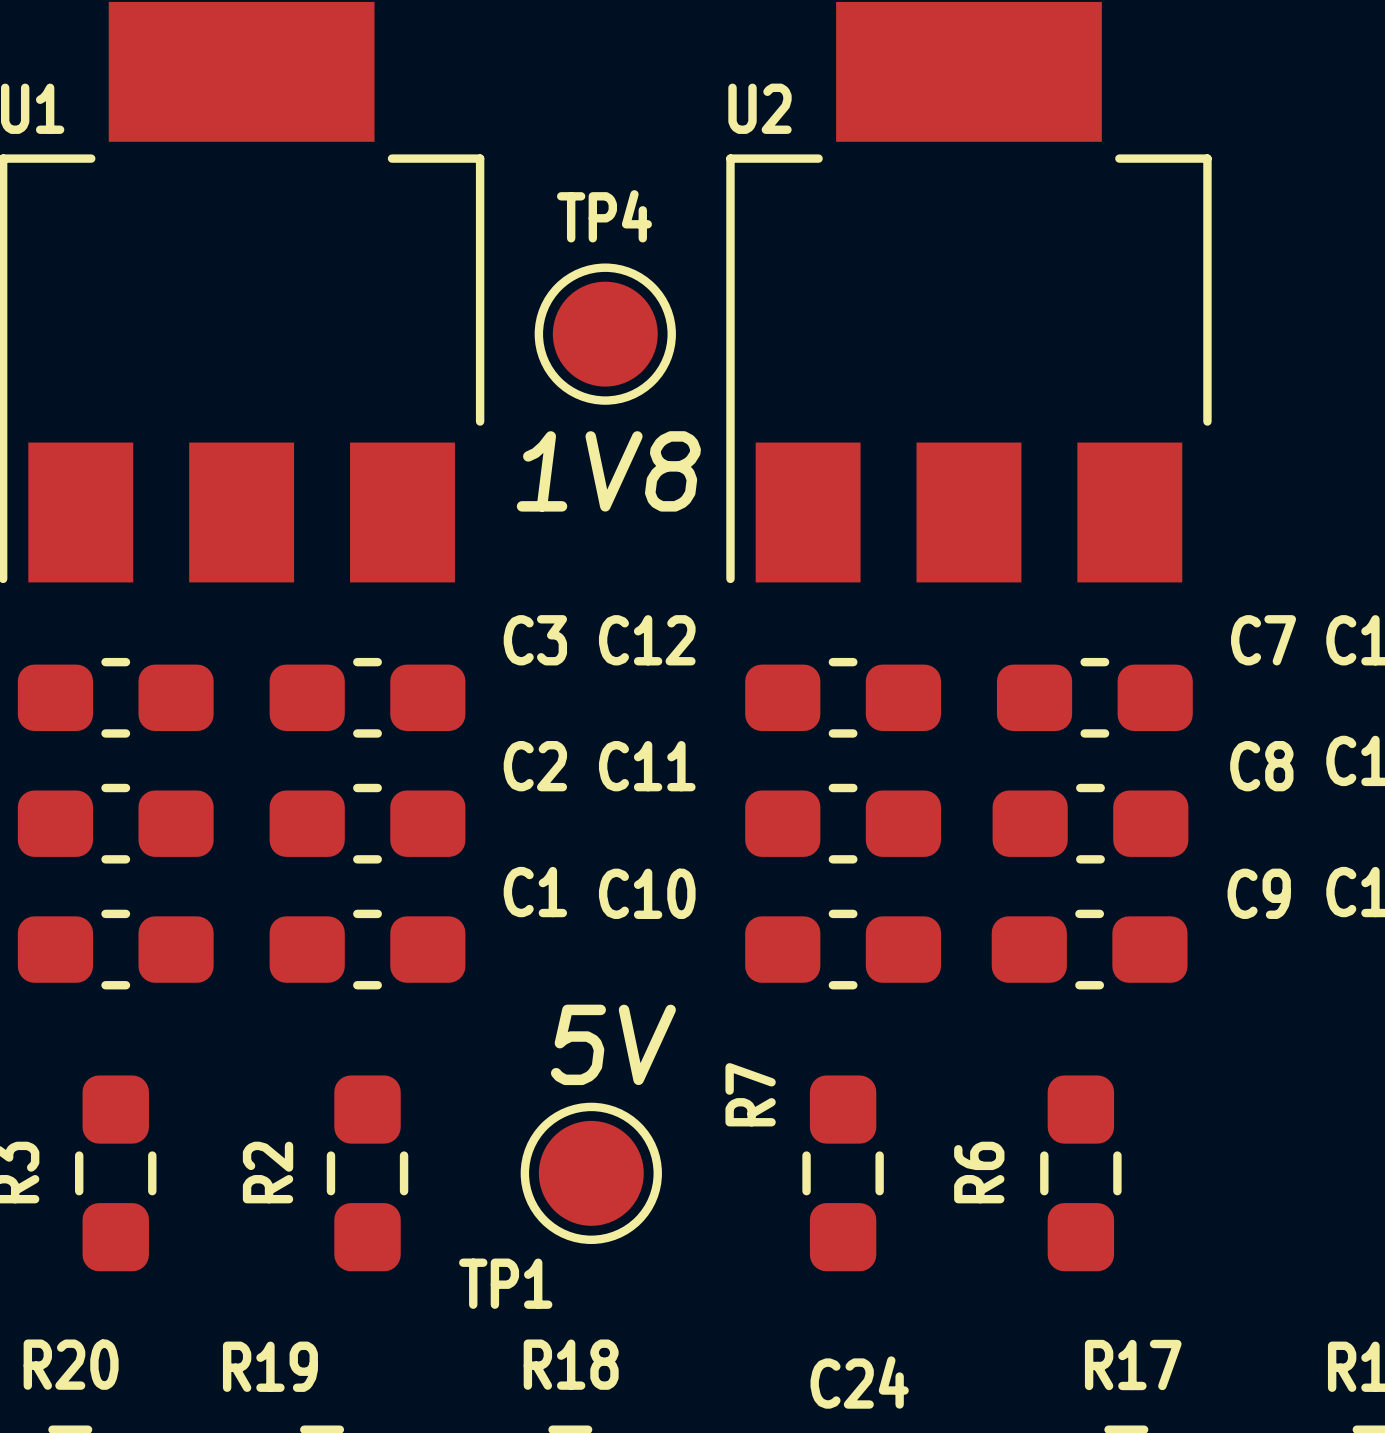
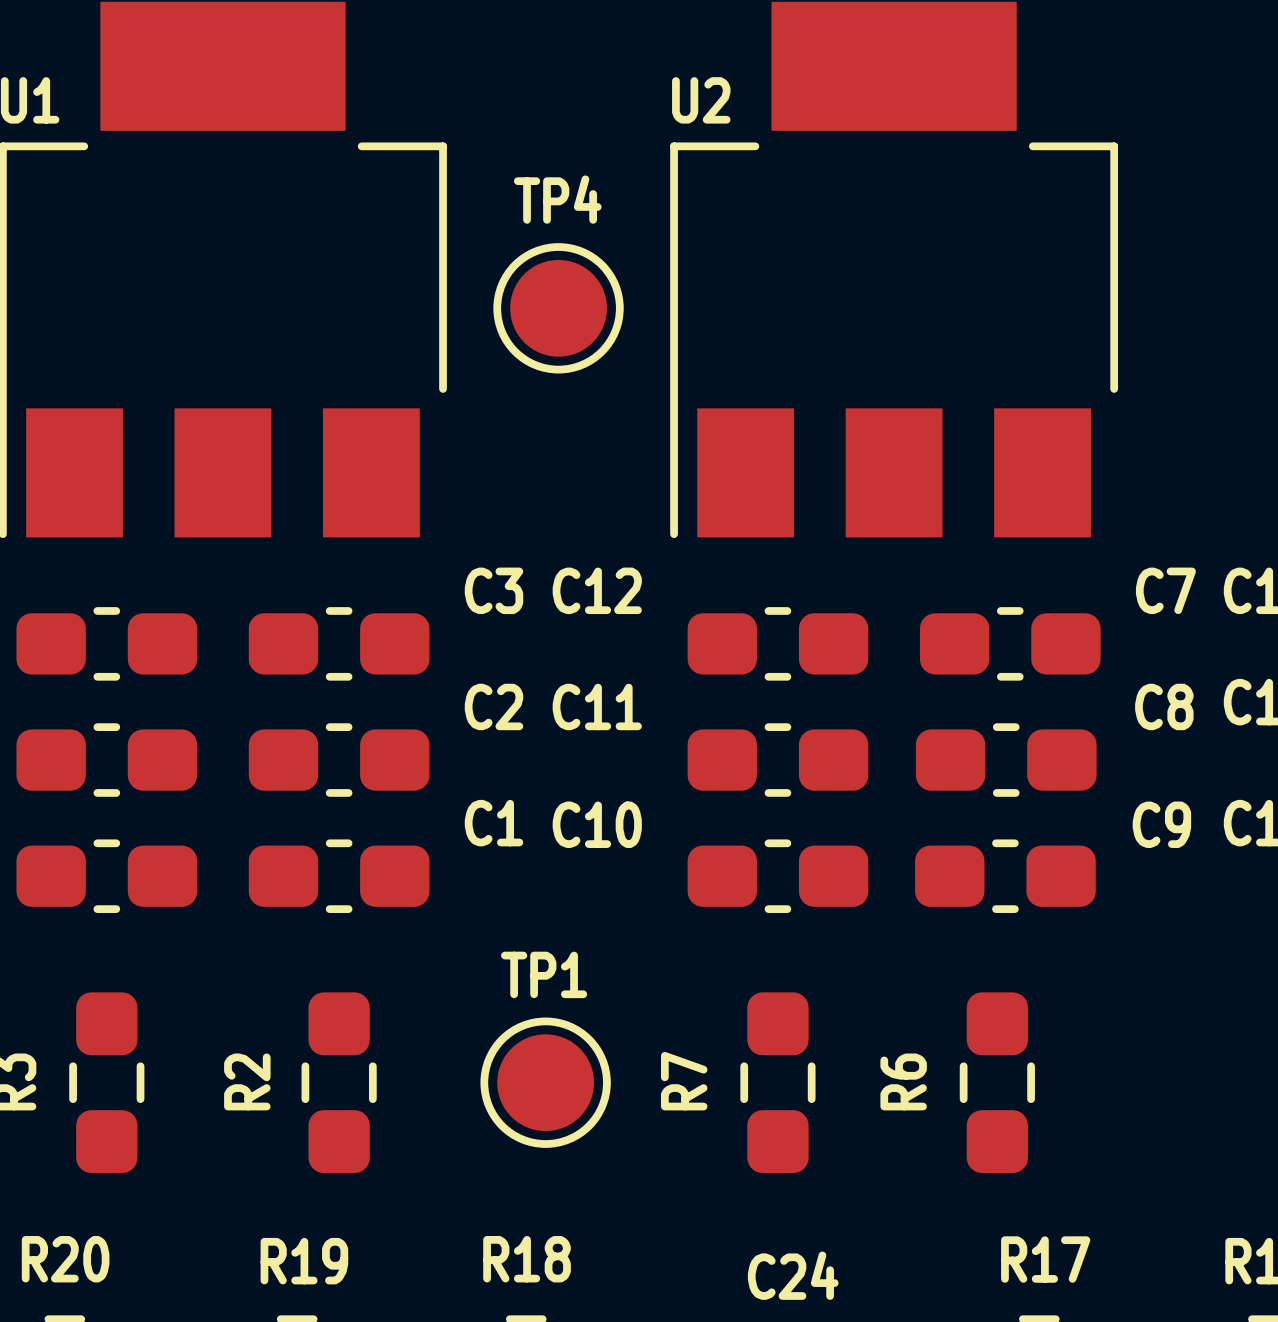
text: 1V8 (608, 471) -> none
text: 5V (613, 1044) -> none
R7 name position: R7 (750, 1094) -> R7 (684, 1081)
TP1 name position: TP1 (505, 1283) -> TP1 (544, 974)
R19 name position: R19 (270, 1366) -> R19 (304, 1261)

